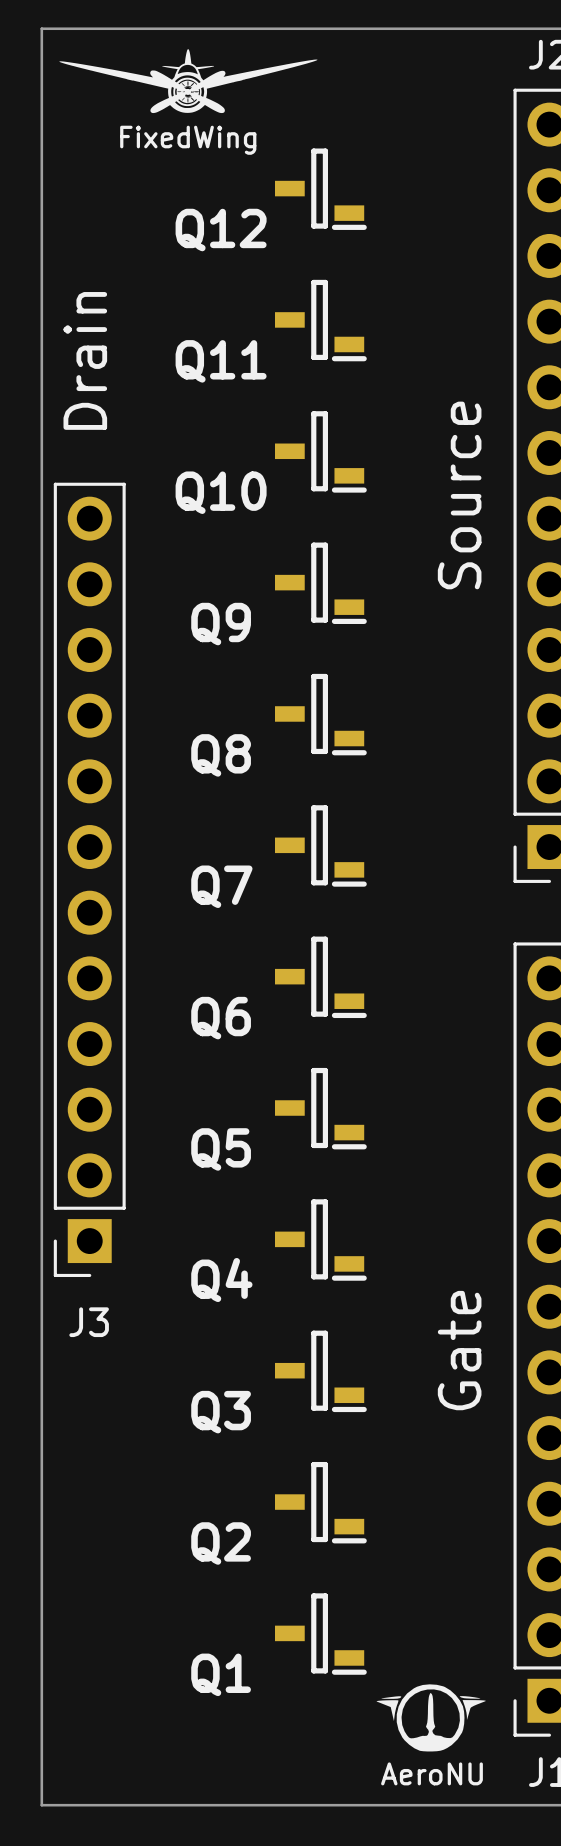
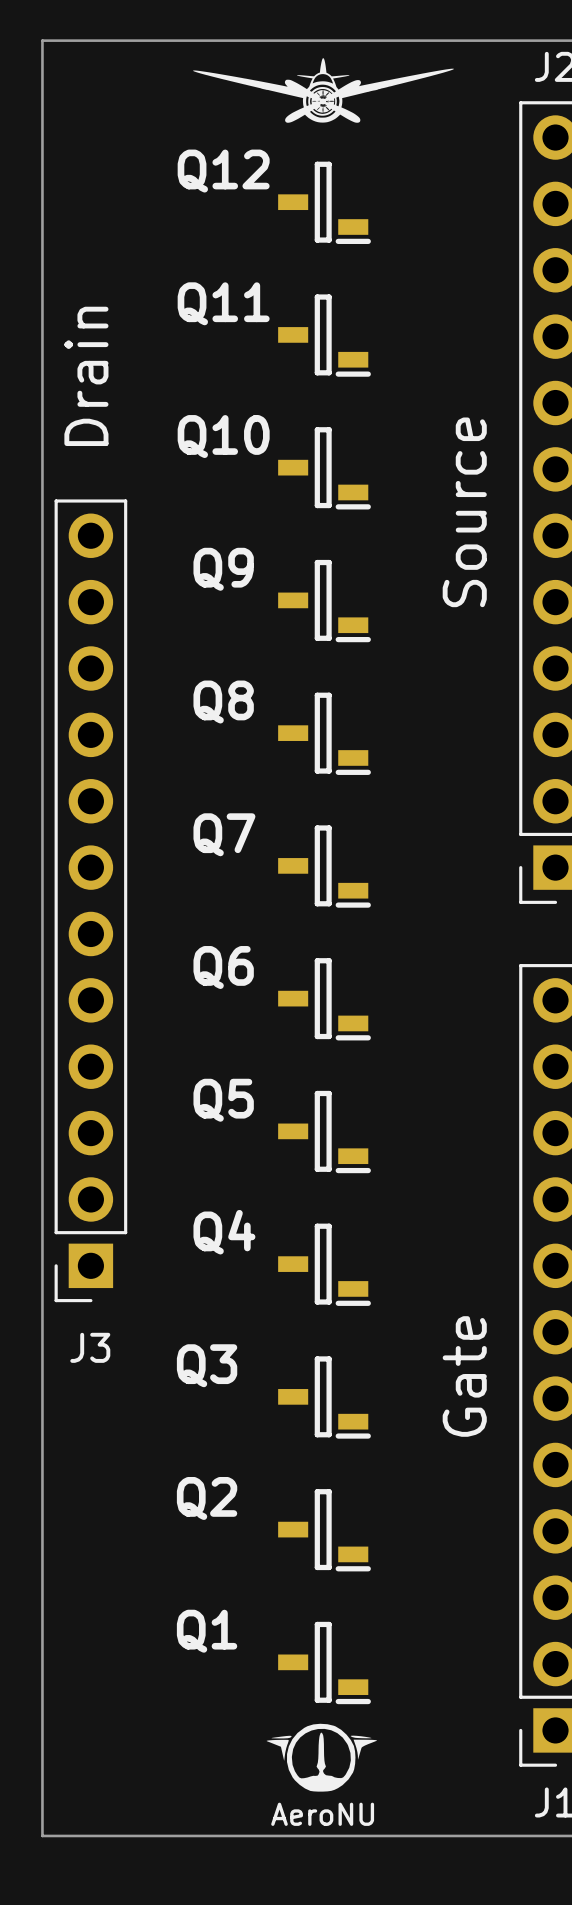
drawing: none -> [193, 58, 454, 123]
FixedWing: (188, 81) -> none
Q12 name position: Q12 (221, 230) -> Q12 (223, 171)
Q11 name position: Q11 (221, 361) -> Q11 (223, 303)
Q10 name position: Q10 (221, 492) -> Q10 (223, 436)
Q9 name position: Q9 (221, 624) -> Q9 (223, 569)
Q8 name position: Q8 (221, 755) -> Q8 (223, 702)
Q7 name position: Q7 (221, 886) -> Q7 (224, 834)
Q6 name position: Q6 (221, 1018) -> Q6 (223, 967)
Q5 name position: Q5 (221, 1149) -> Q5 (223, 1100)
Q4 name position: Q4 (221, 1280) -> Q4 (224, 1232)
Q3 name position: Q3 (221, 1412) -> Q3 (207, 1365)
Q2 name position: Q2 (221, 1543) -> Q2 (207, 1498)
Q1 name position: Q1 (221, 1674) -> Q1 (207, 1631)
drawing position: (431, 1717) -> (321, 1757)
text position: AeroNU (431, 1773) -> AeroNU (322, 1814)

